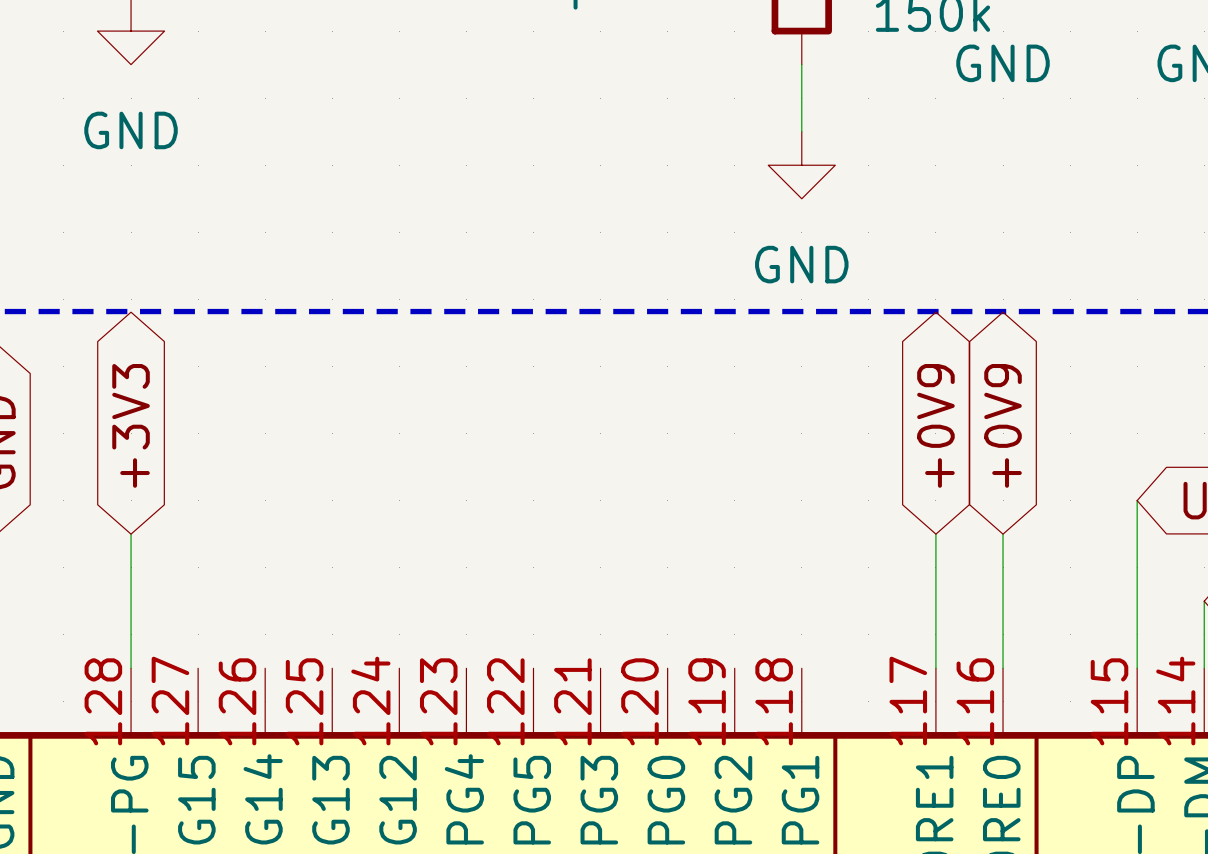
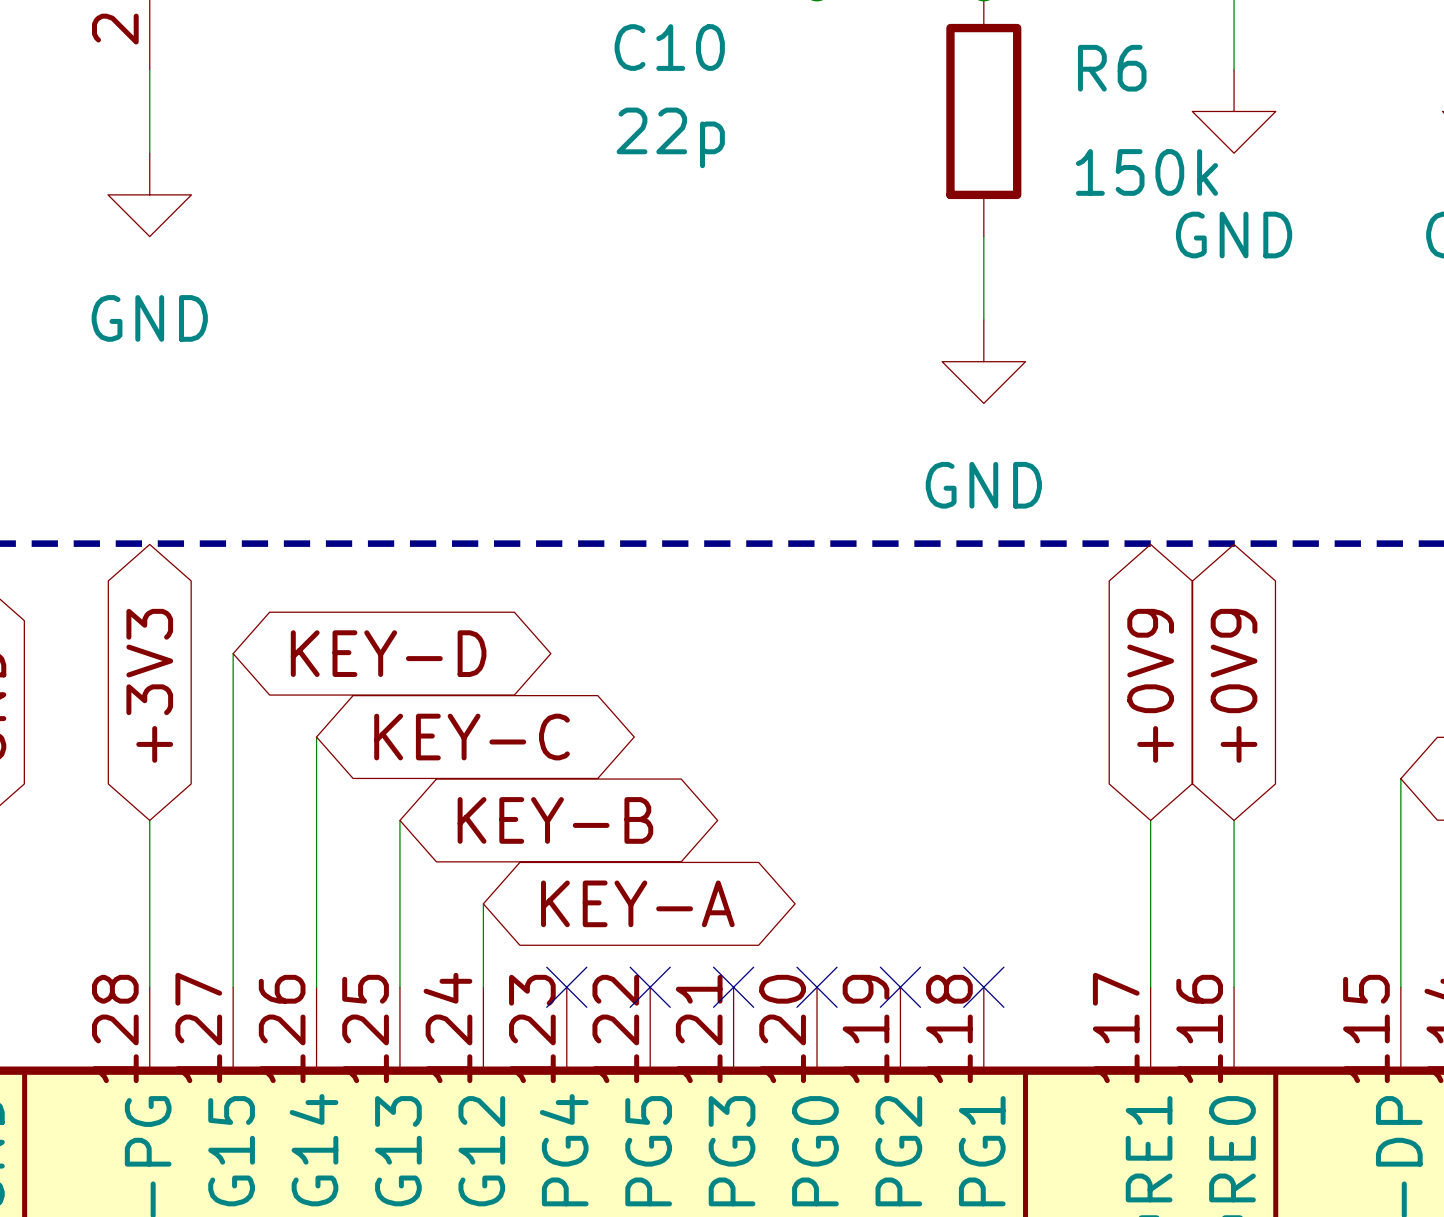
wire: none -> (233, 653) (233, 987)
global label: none -> KEY-D (388, 653)
wire: none -> (316, 737) (316, 987)
global label: none -> KEY-C (472, 737)
wire: none -> (399, 820) (399, 987)
global label: none -> KEY-B (555, 820)
wire: none -> (483, 903) (483, 987)
global label: none -> KEY-A (637, 903)
no-connect mark: none -> (566, 987)
no-connect mark: none -> (650, 987)
no-connect mark: none -> (733, 987)
no-connect mark: none -> (817, 987)
no-connect mark: none -> (900, 987)
no-connect mark: none -> (983, 987)

